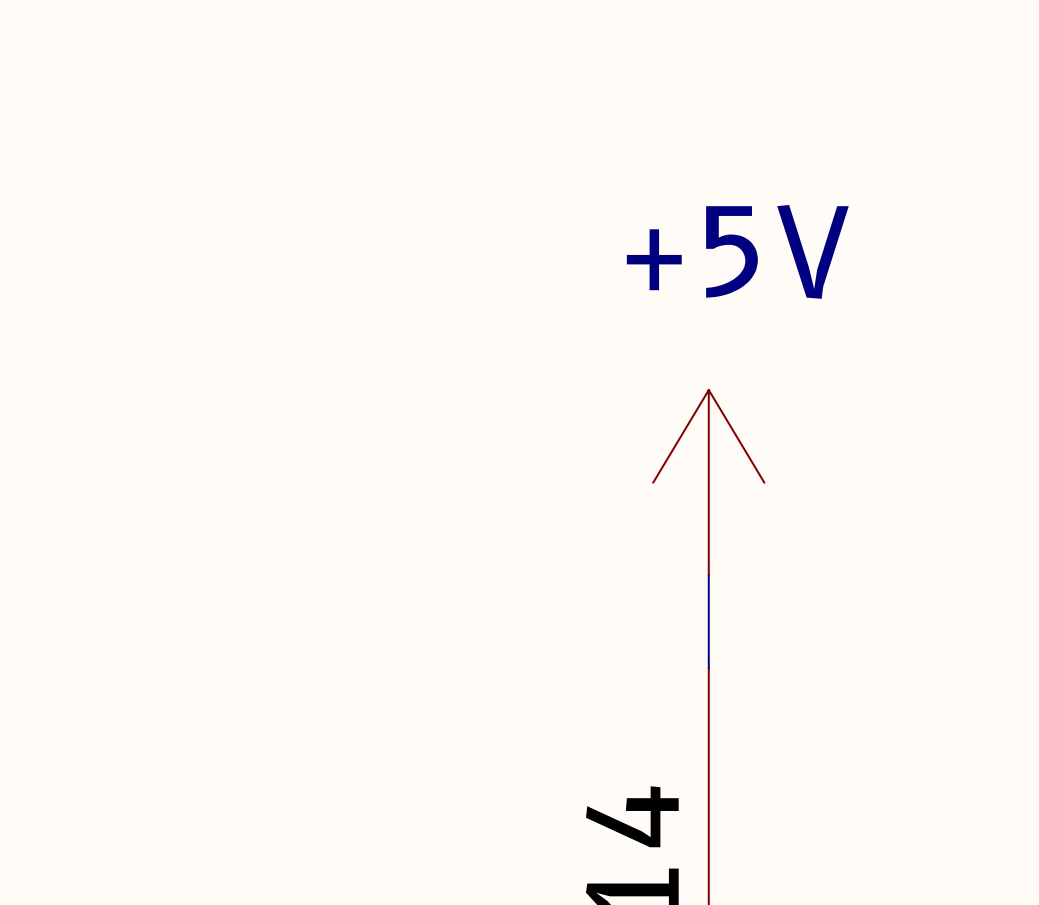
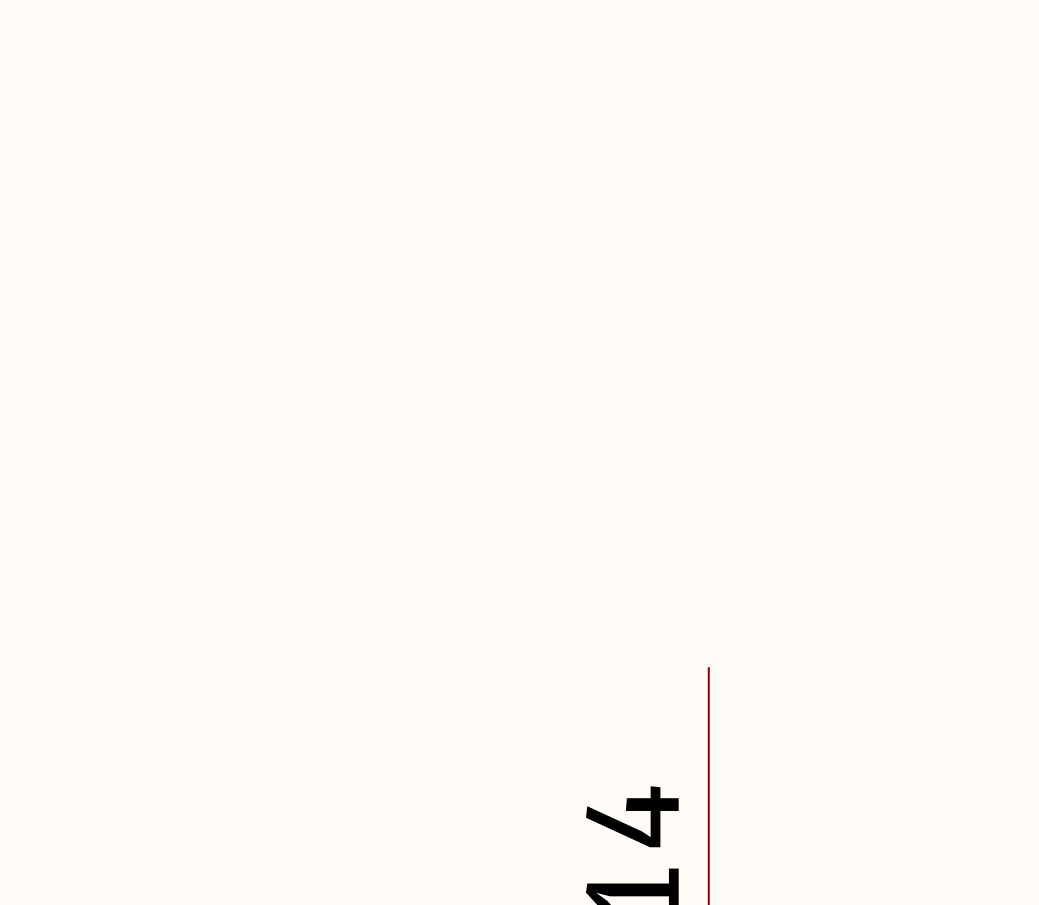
power symbol: +5V (708, 482) -> none
wire: (708, 575) (708, 668) -> none

